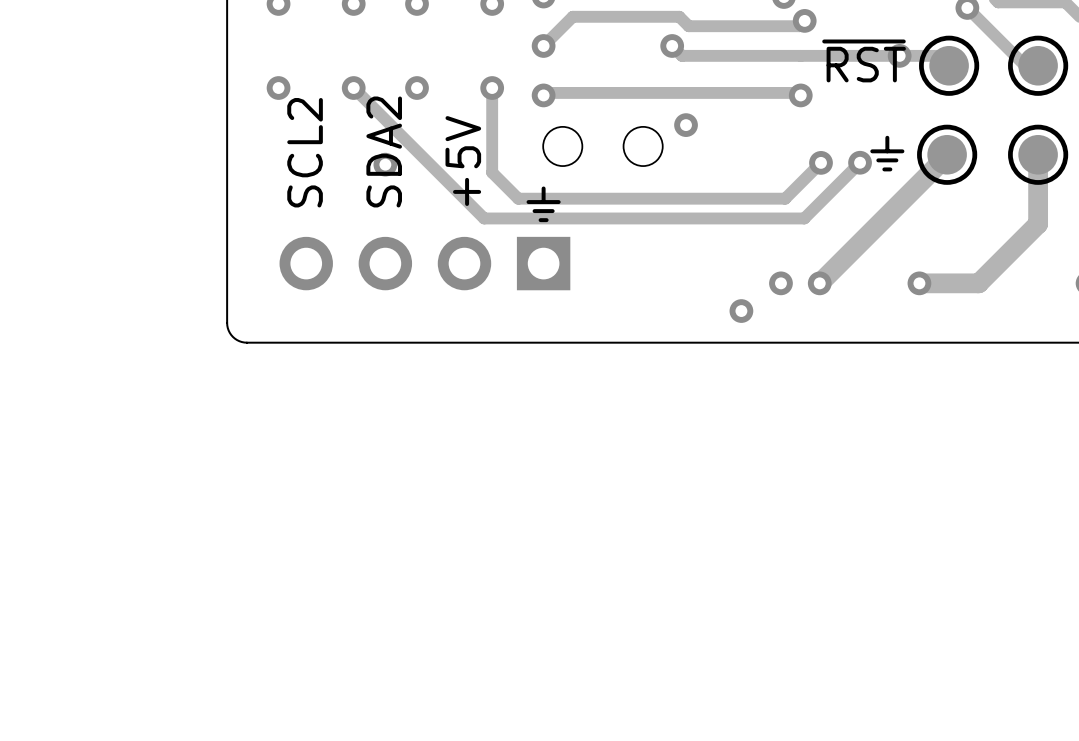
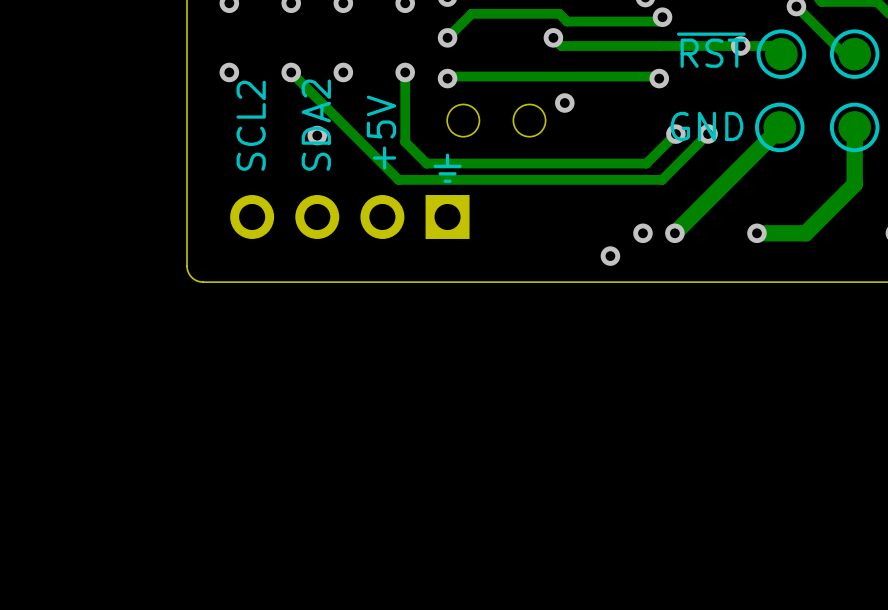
text: ⏚ (887, 153) -> GND (706, 126)

